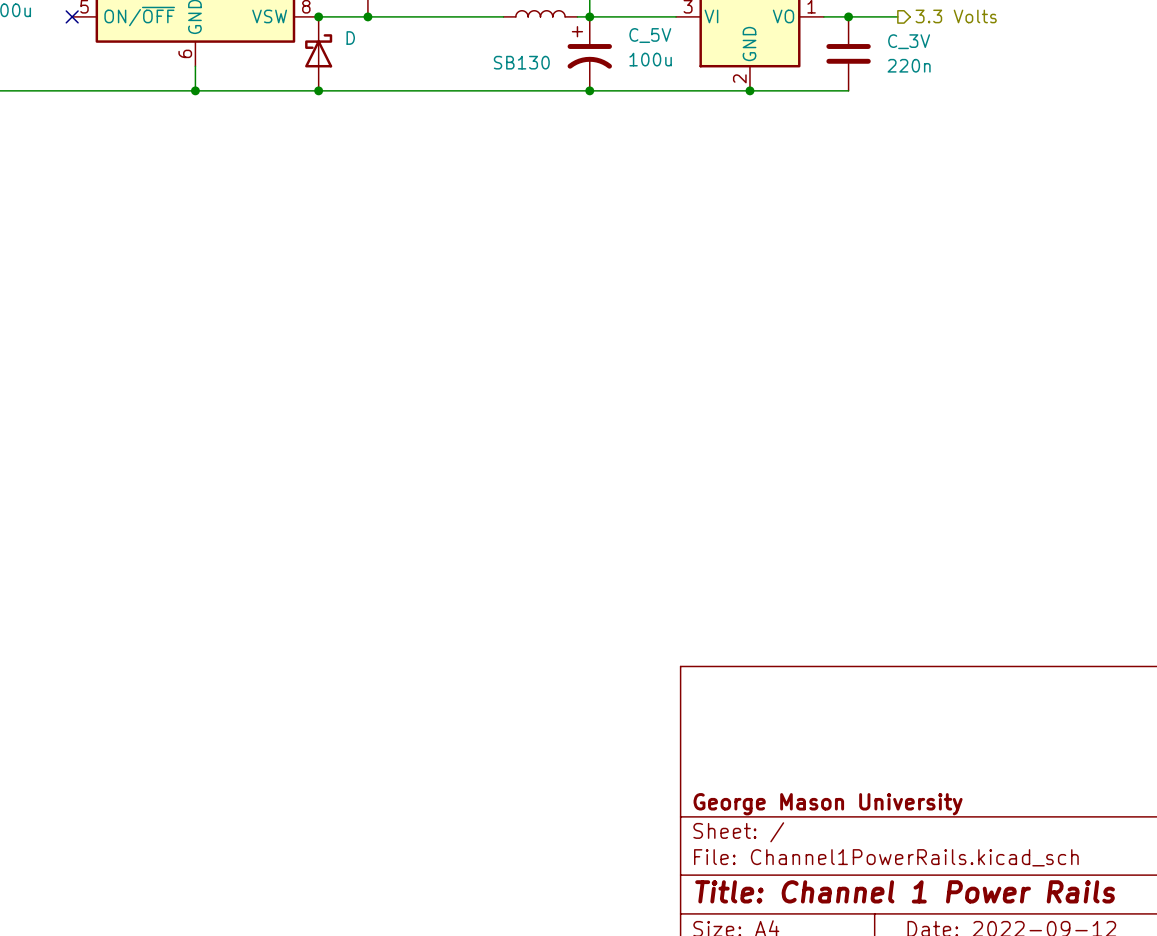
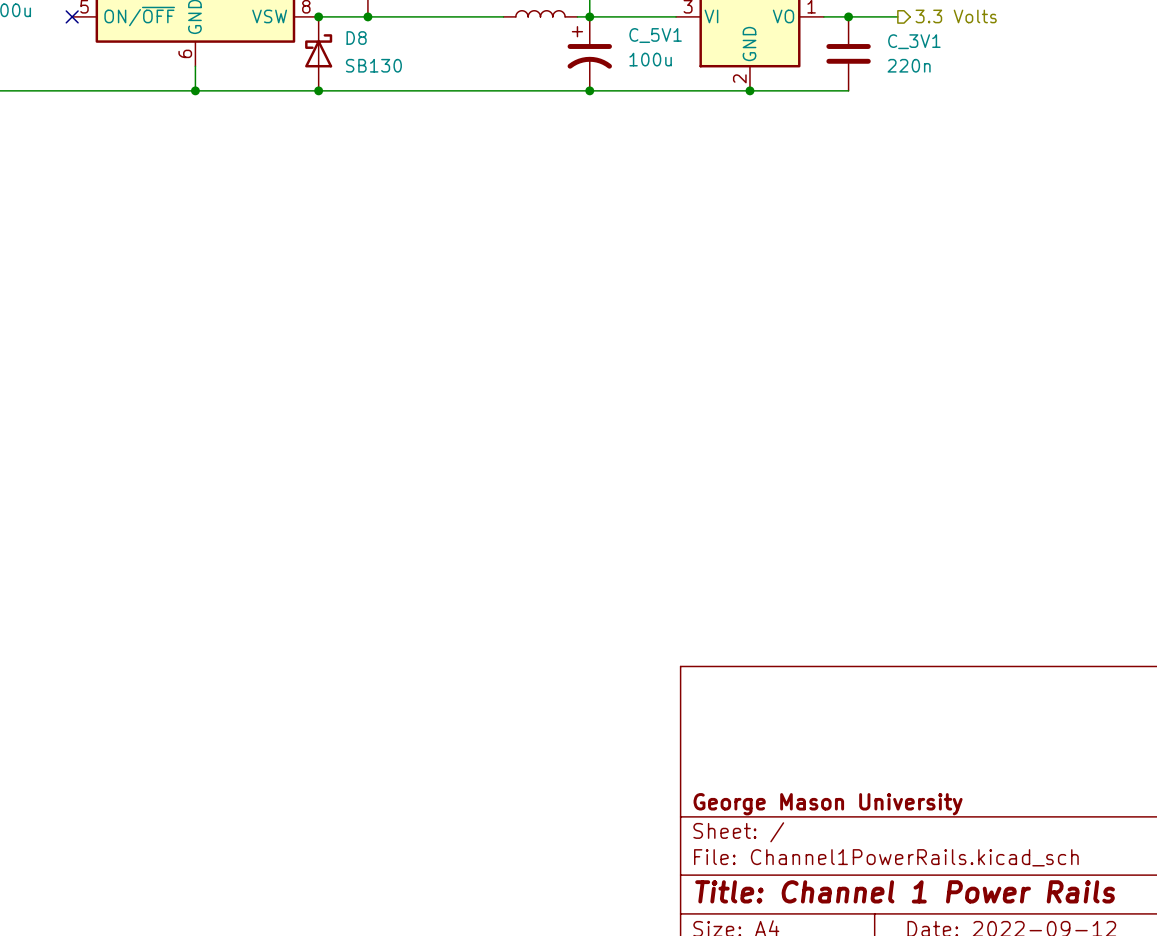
C_5V name: C_5V (650, 35) -> C_5V1 (655, 35)
D name: D (350, 38) -> D8 (356, 38)
C_3V name: C_3V (909, 41) -> C_3V1 (914, 41)
D value position: SB130 (521, 62) -> SB130 (373, 65)

